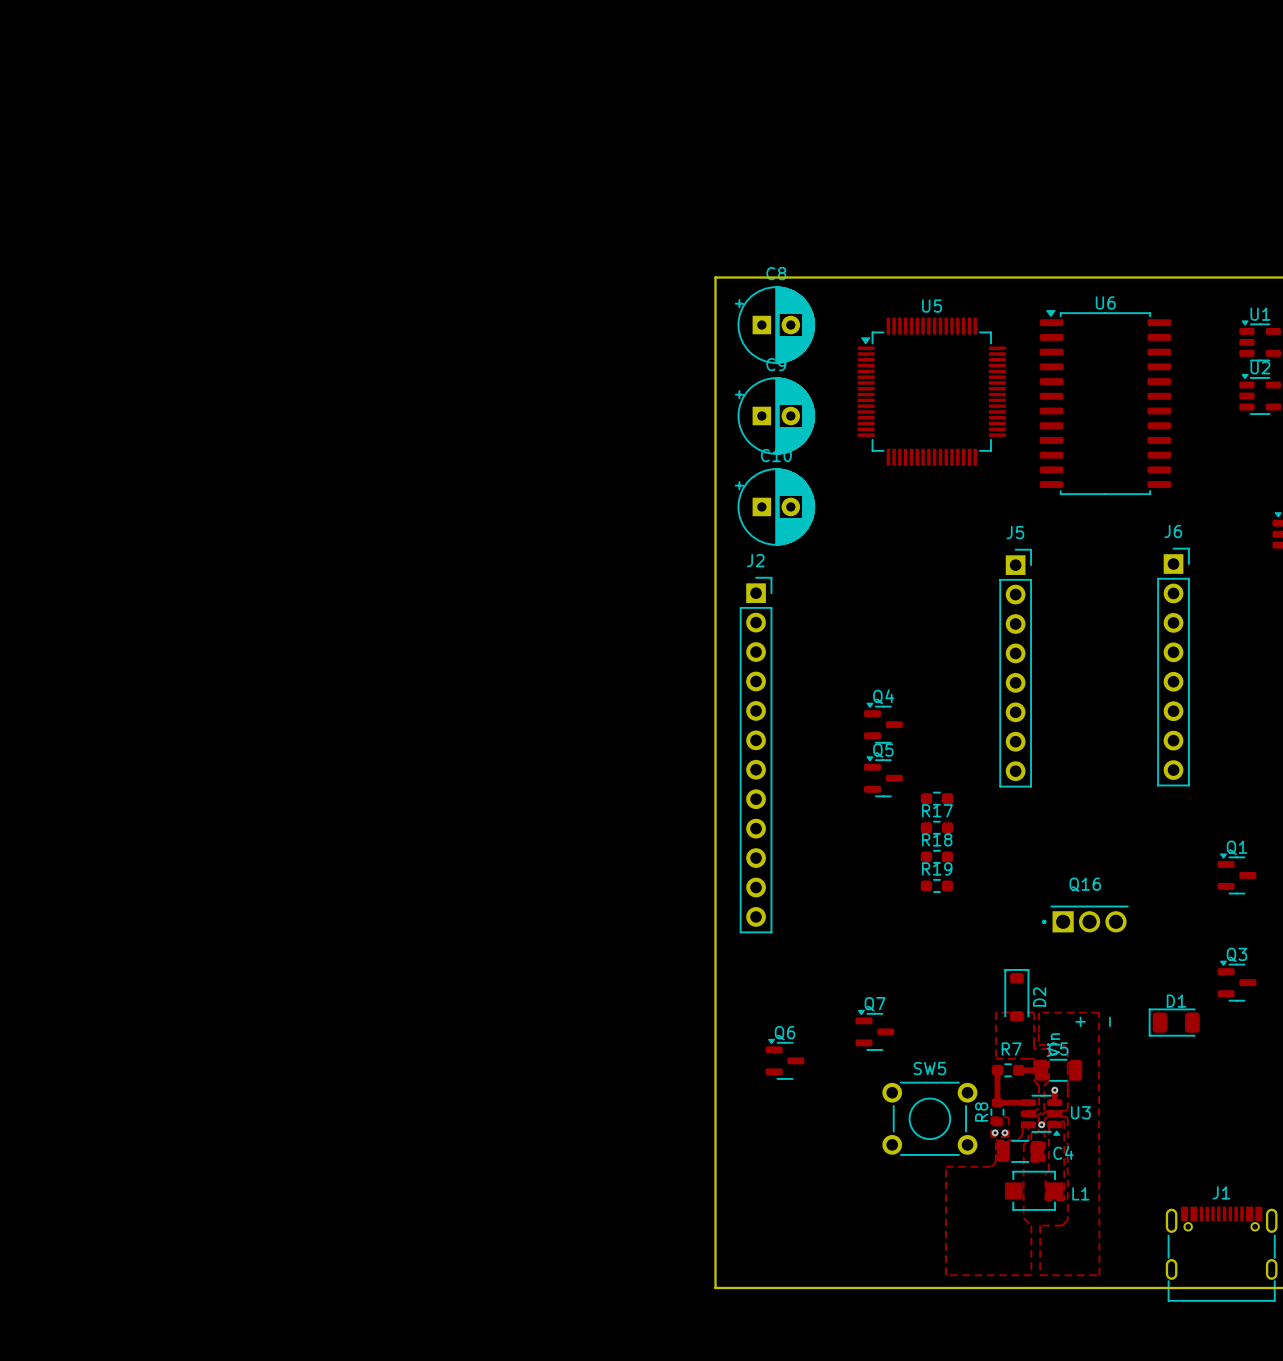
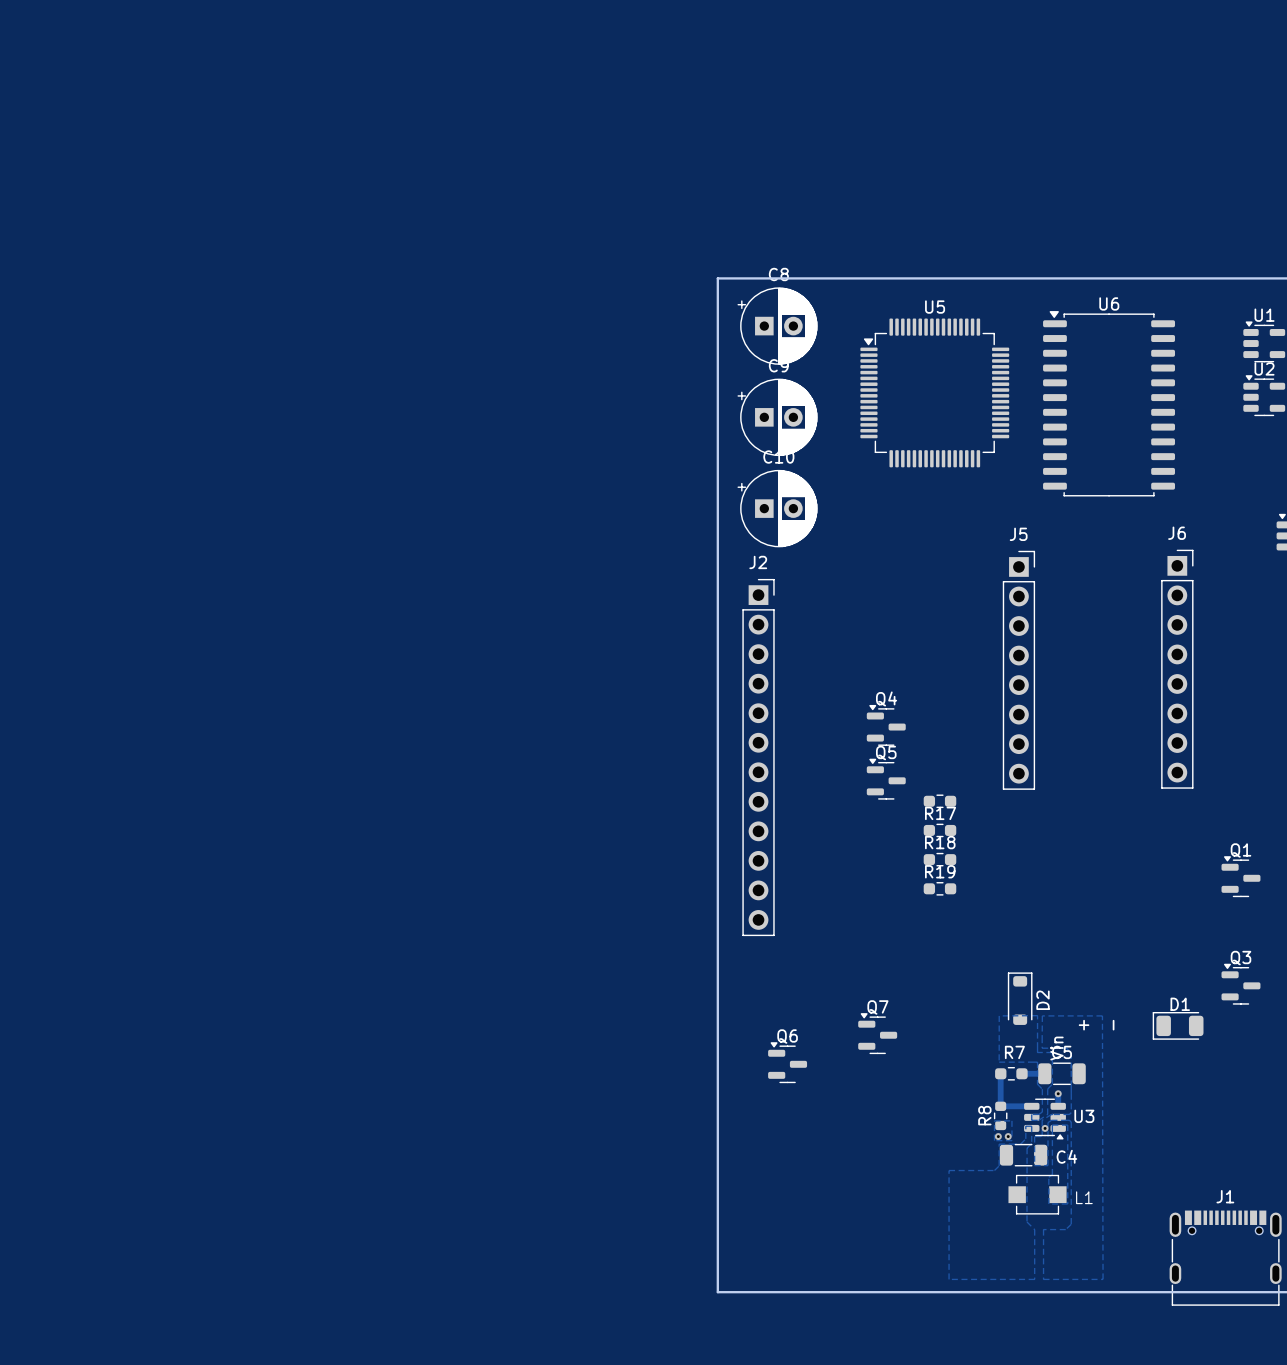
Q16: (1085, 919) -> none
SW5: (929, 1118) -> none

